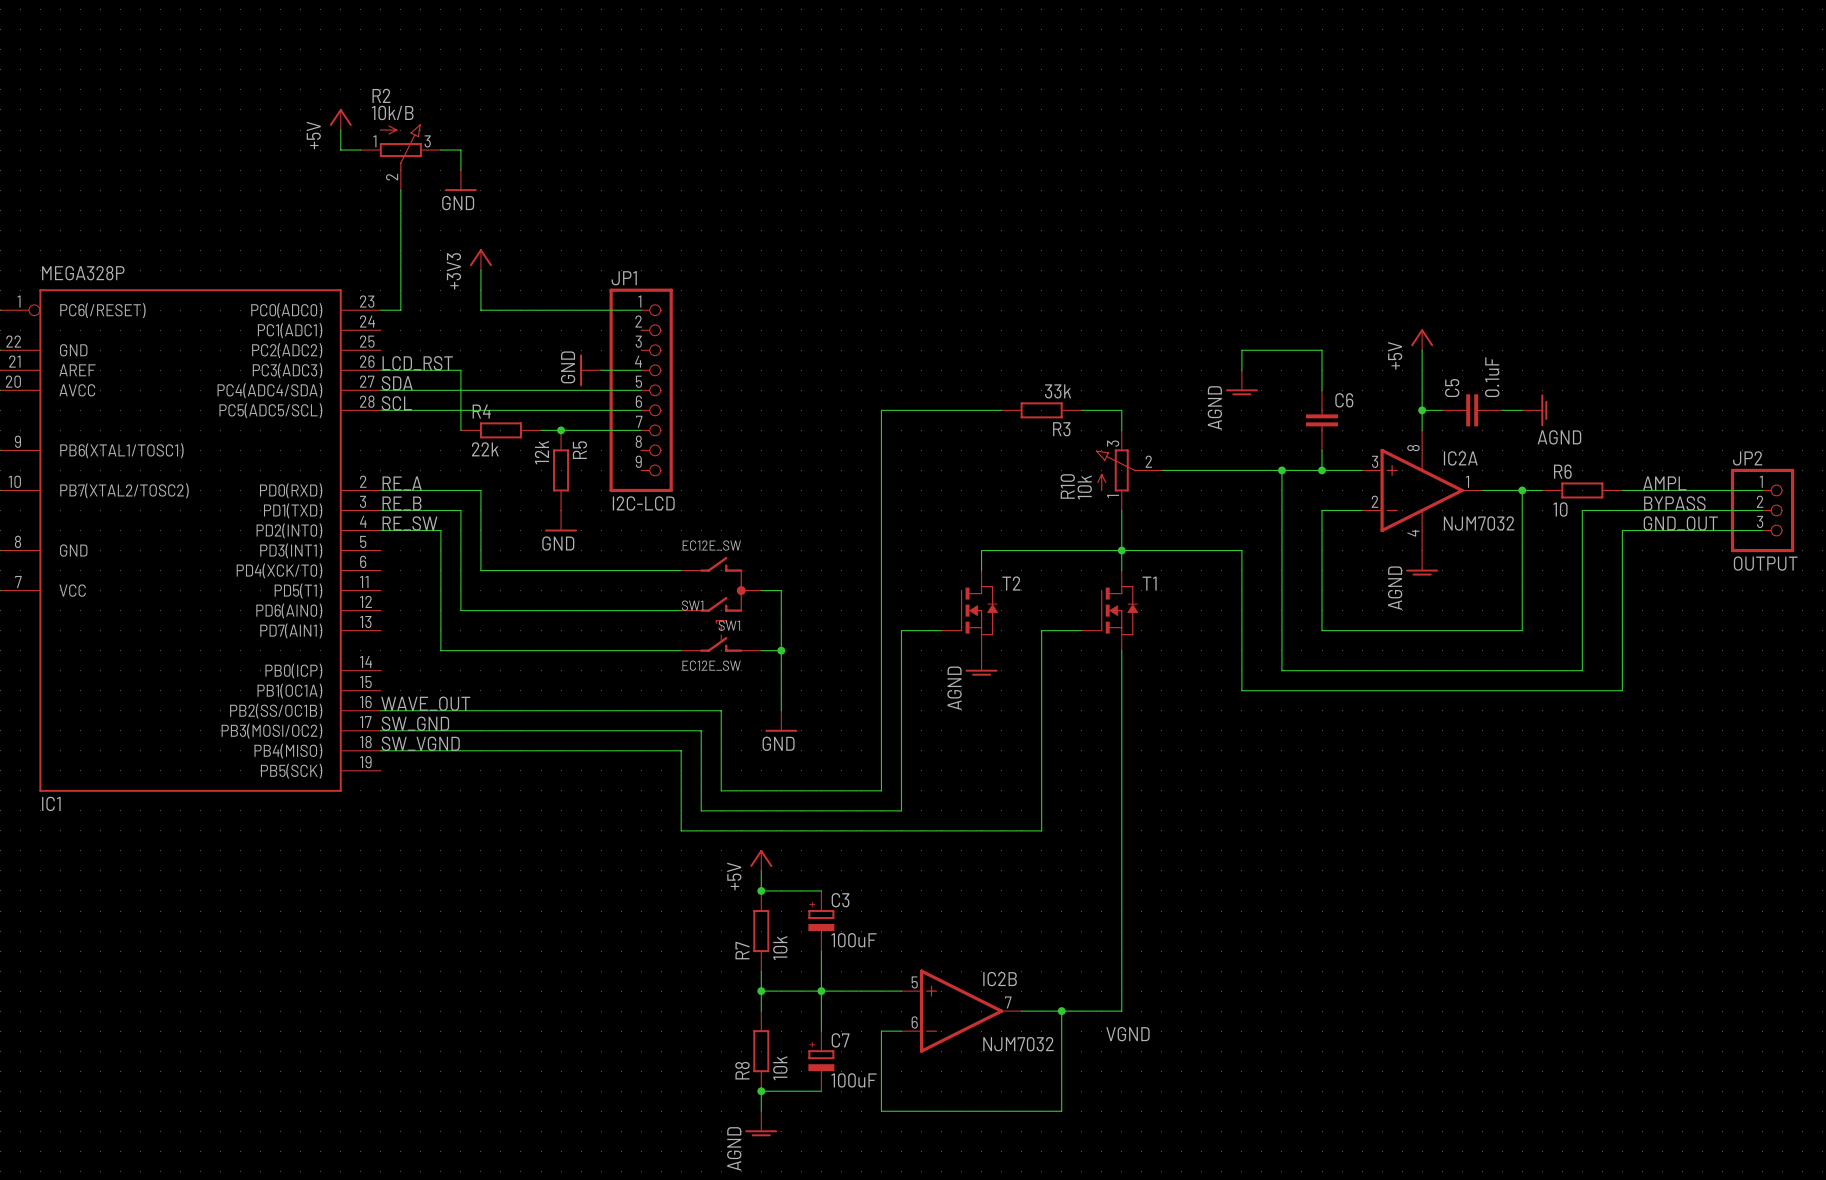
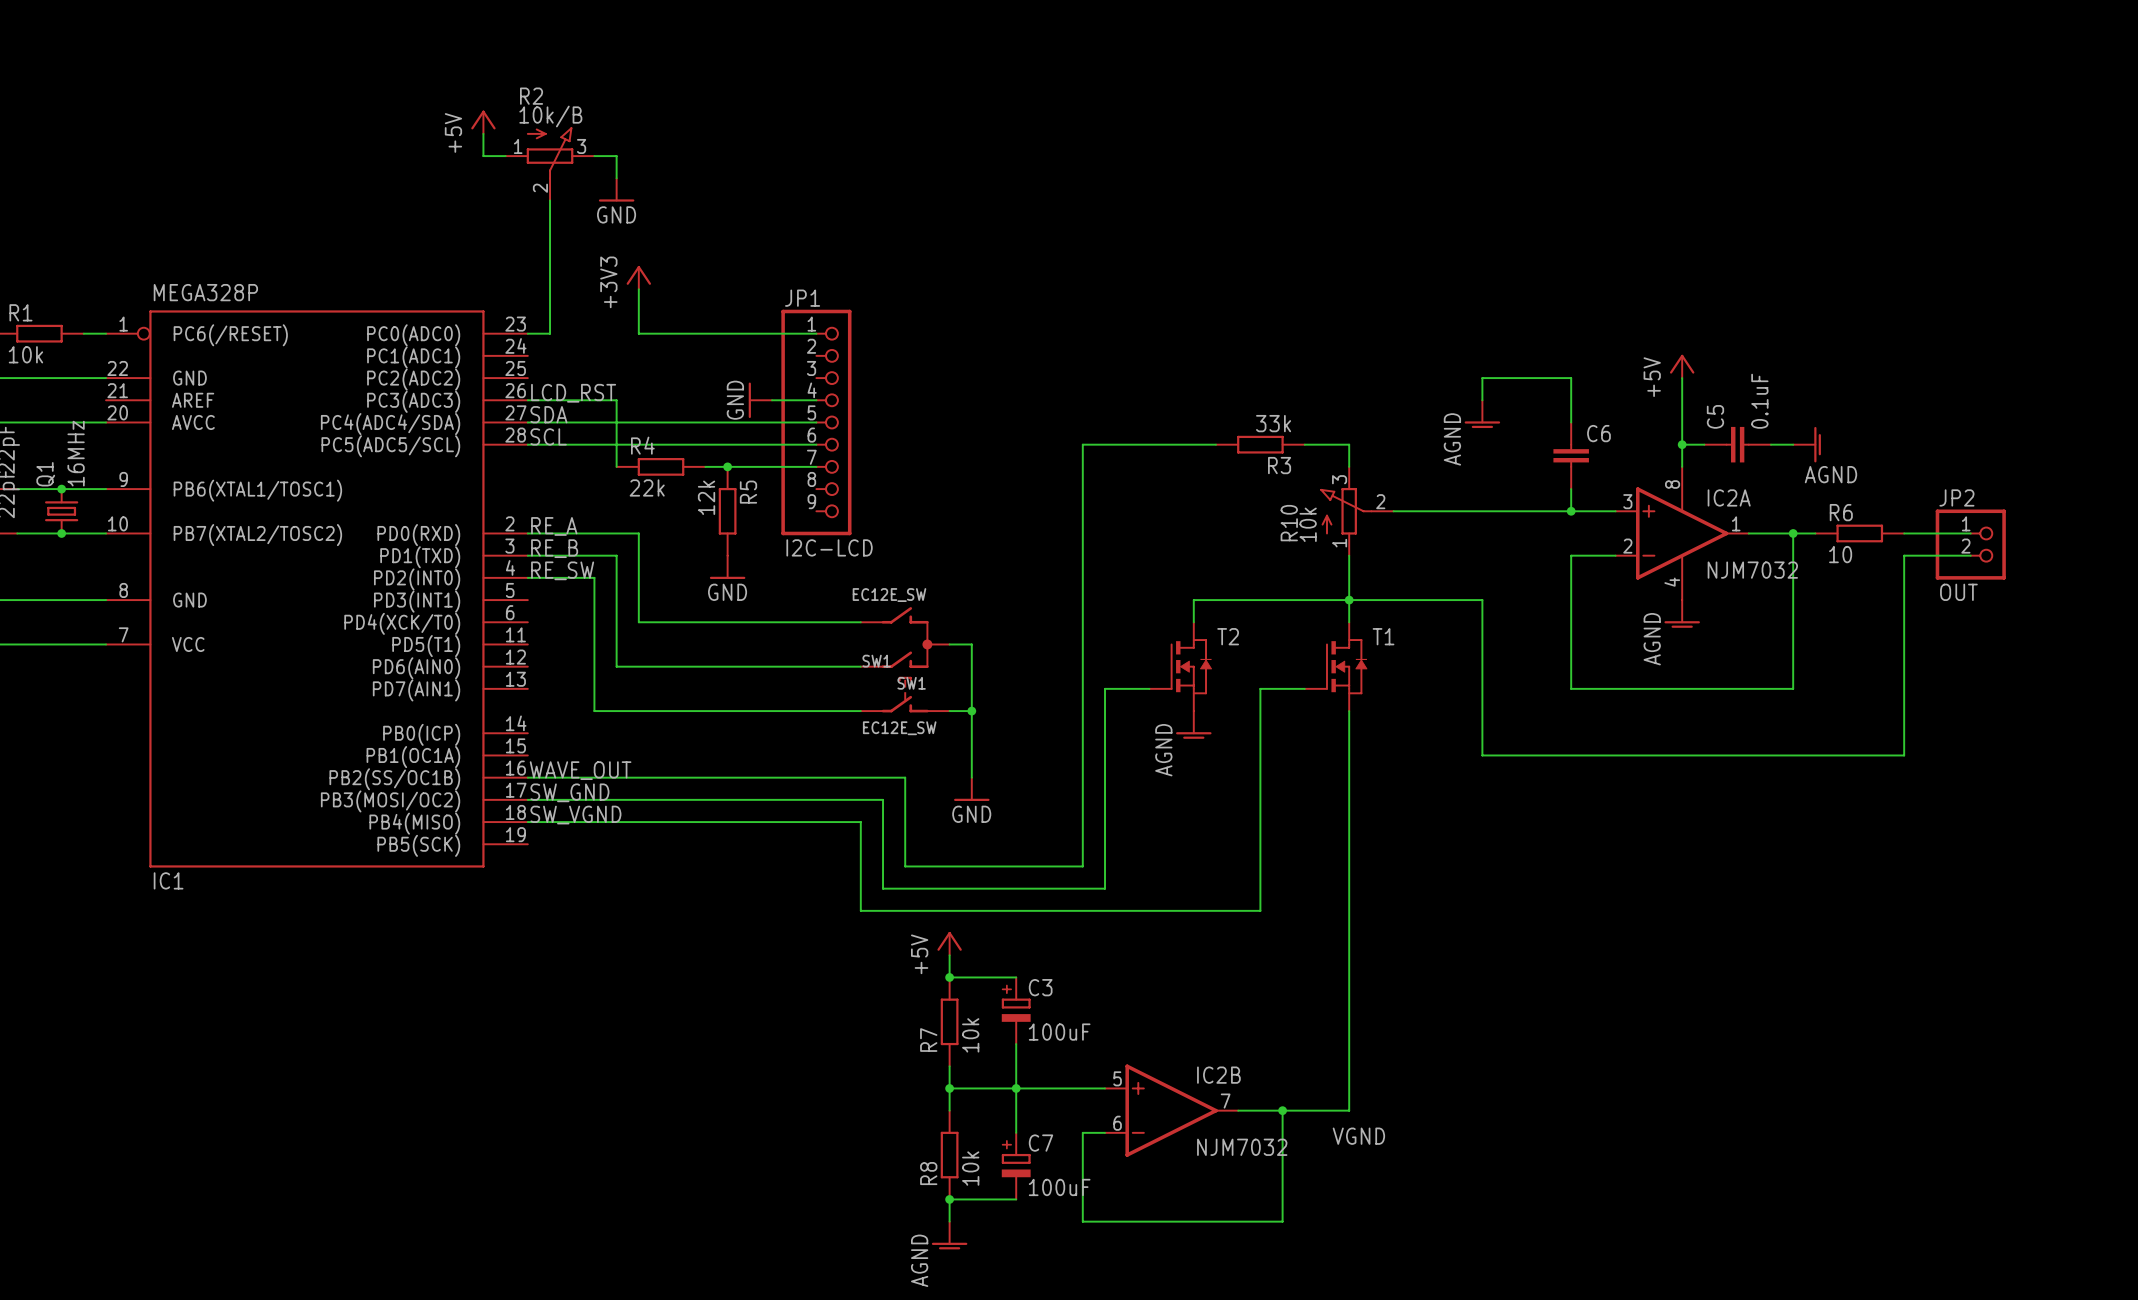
JP2 symbol: [1730, 468, 1795, 553] -> [1935, 509, 2006, 580]
wire: (1281, 470) (1281, 670) (1582, 670) (1582, 510) (1622, 510) -> none
junction: (1281, 470) -> none
label: AMPL (1664, 483) -> none
wire: (1682, 490) (1762, 490) -> none
label: BYPASS (1674, 503) -> none
wire: (1682, 510) (1762, 510) -> none
label: GND_OUT (1680, 523) -> none
wire: (1622, 530) (1762, 530) -> (1904, 577) (1904, 555)
JP2 value: OUTPUT (1765, 563) -> OUT (1958, 592)

